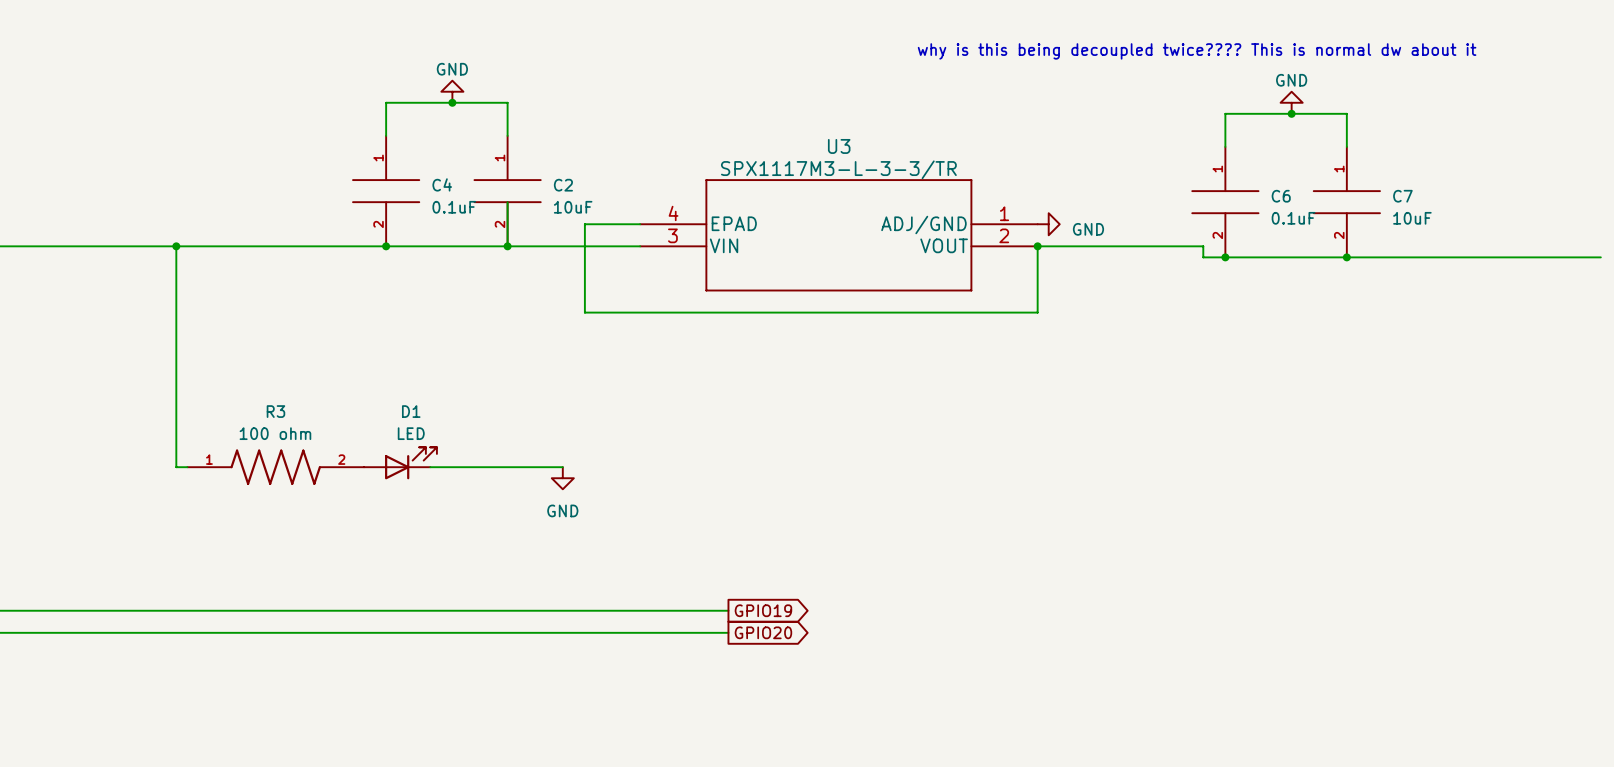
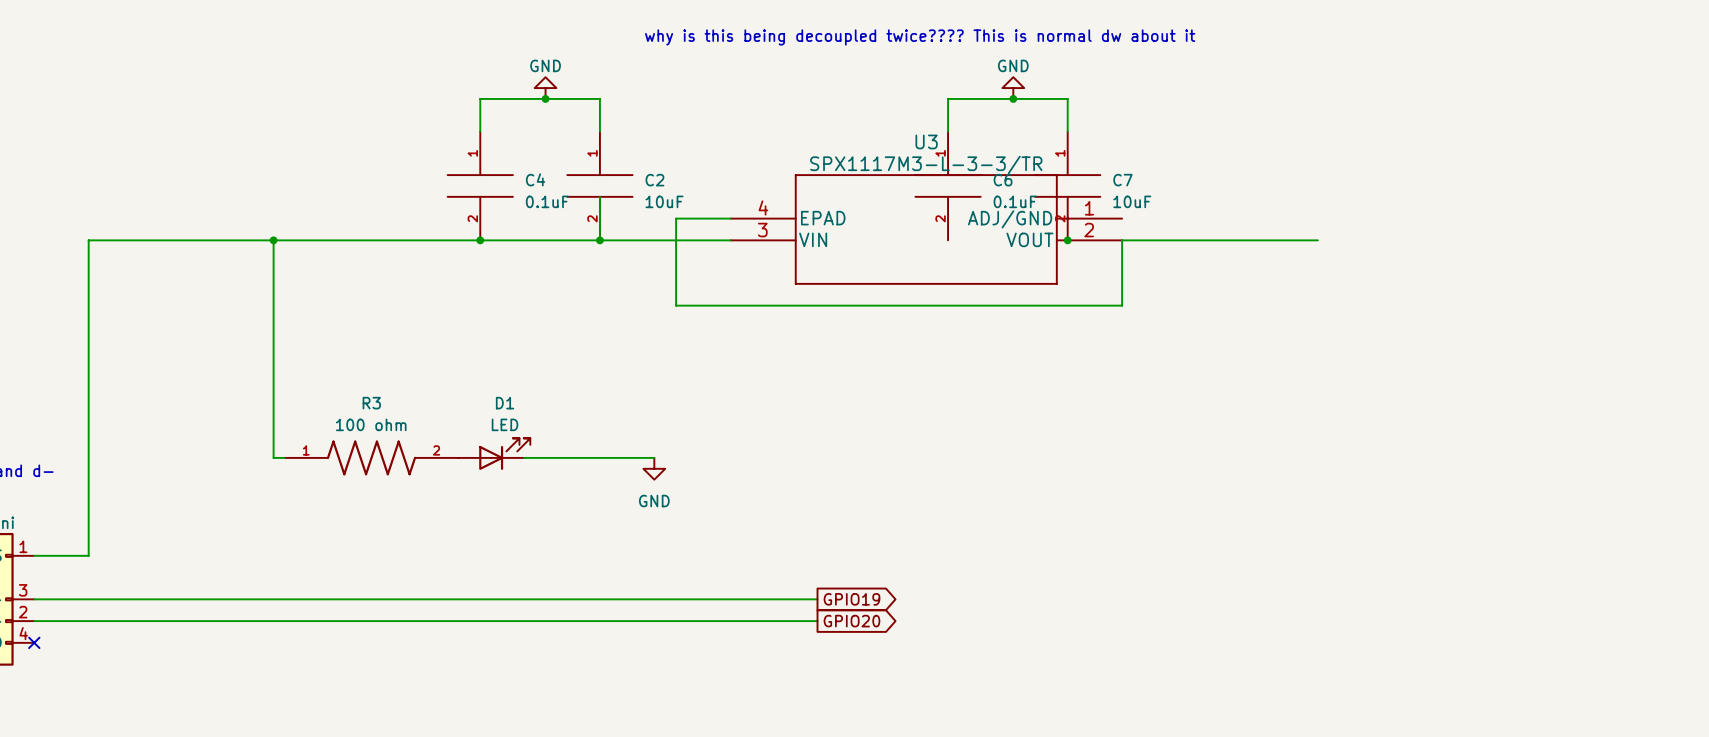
text: none -> why is this being decoupled twice???? This is normal dw about it (920, 37)
text: why is this being decoupled twice???? This is normal dw about it (1197, 51) -> none
junction: none -> (1013, 98)
power symbol: GND (1291, 102) -> none
junction: (1291, 113) -> none
wire: none -> (948, 131) (948, 98) (1067, 98) (1067, 131)
wire: (1225, 146) (1225, 113) (1346, 113) (1346, 146) -> none
C6 position: (1225, 202) -> (948, 185)
C7 position: (1346, 202) -> (1067, 185)
power symbol rotation: 0° (1048, 224) -> 90° counterclockwise (1013, 88)
power symbol position: GND (1048, 224) -> GND (1013, 88)
power symbol text position: GND (1088, 229) -> GND (1013, 65)
junction: none -> (1067, 240)
junction: (1037, 246) -> none
wire: (1203, 246) (1203, 257) (1600, 257) -> (1285, 240) (1317, 240)
junction: (1225, 257) -> none
junction: (1346, 257) -> none

